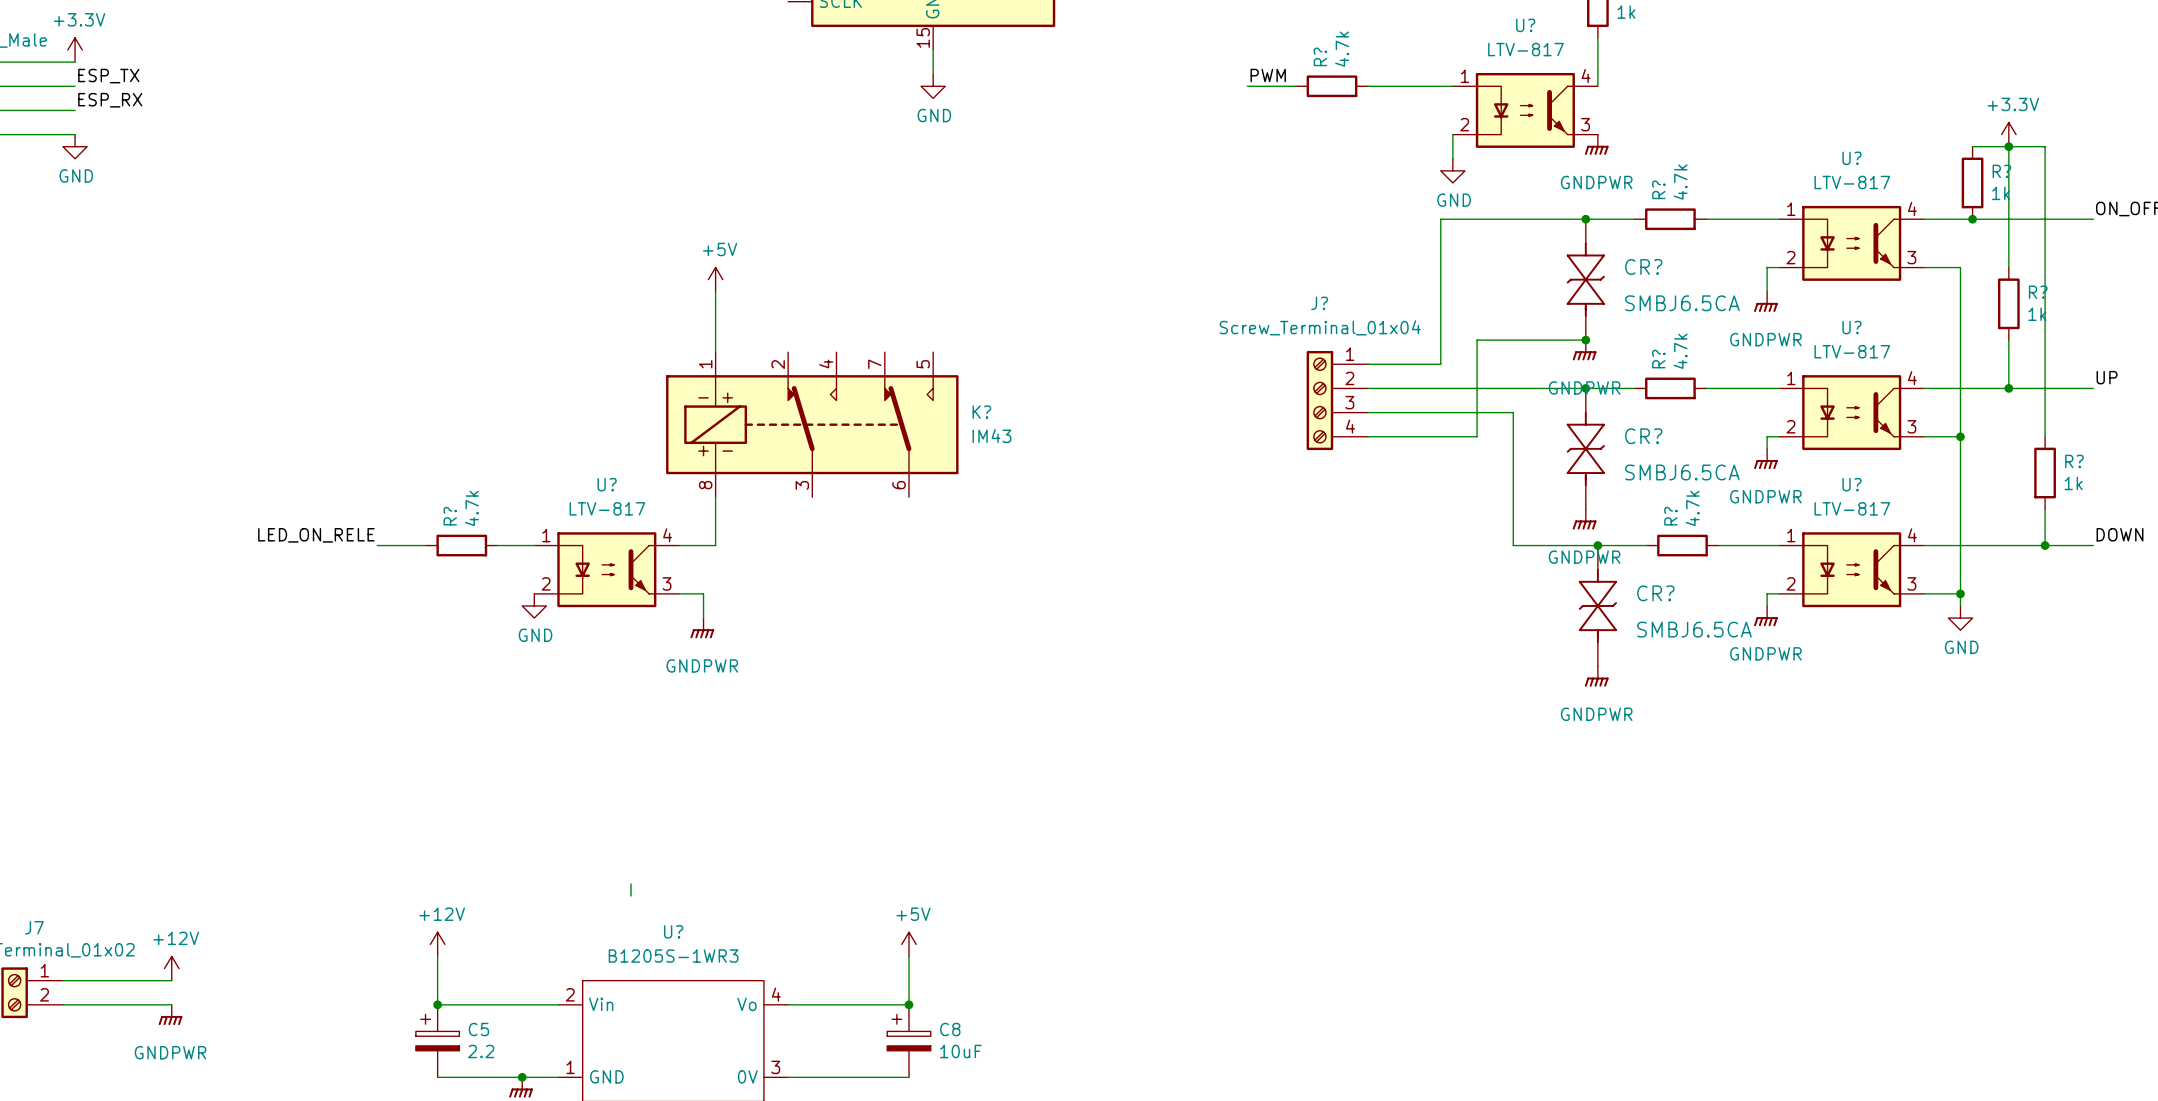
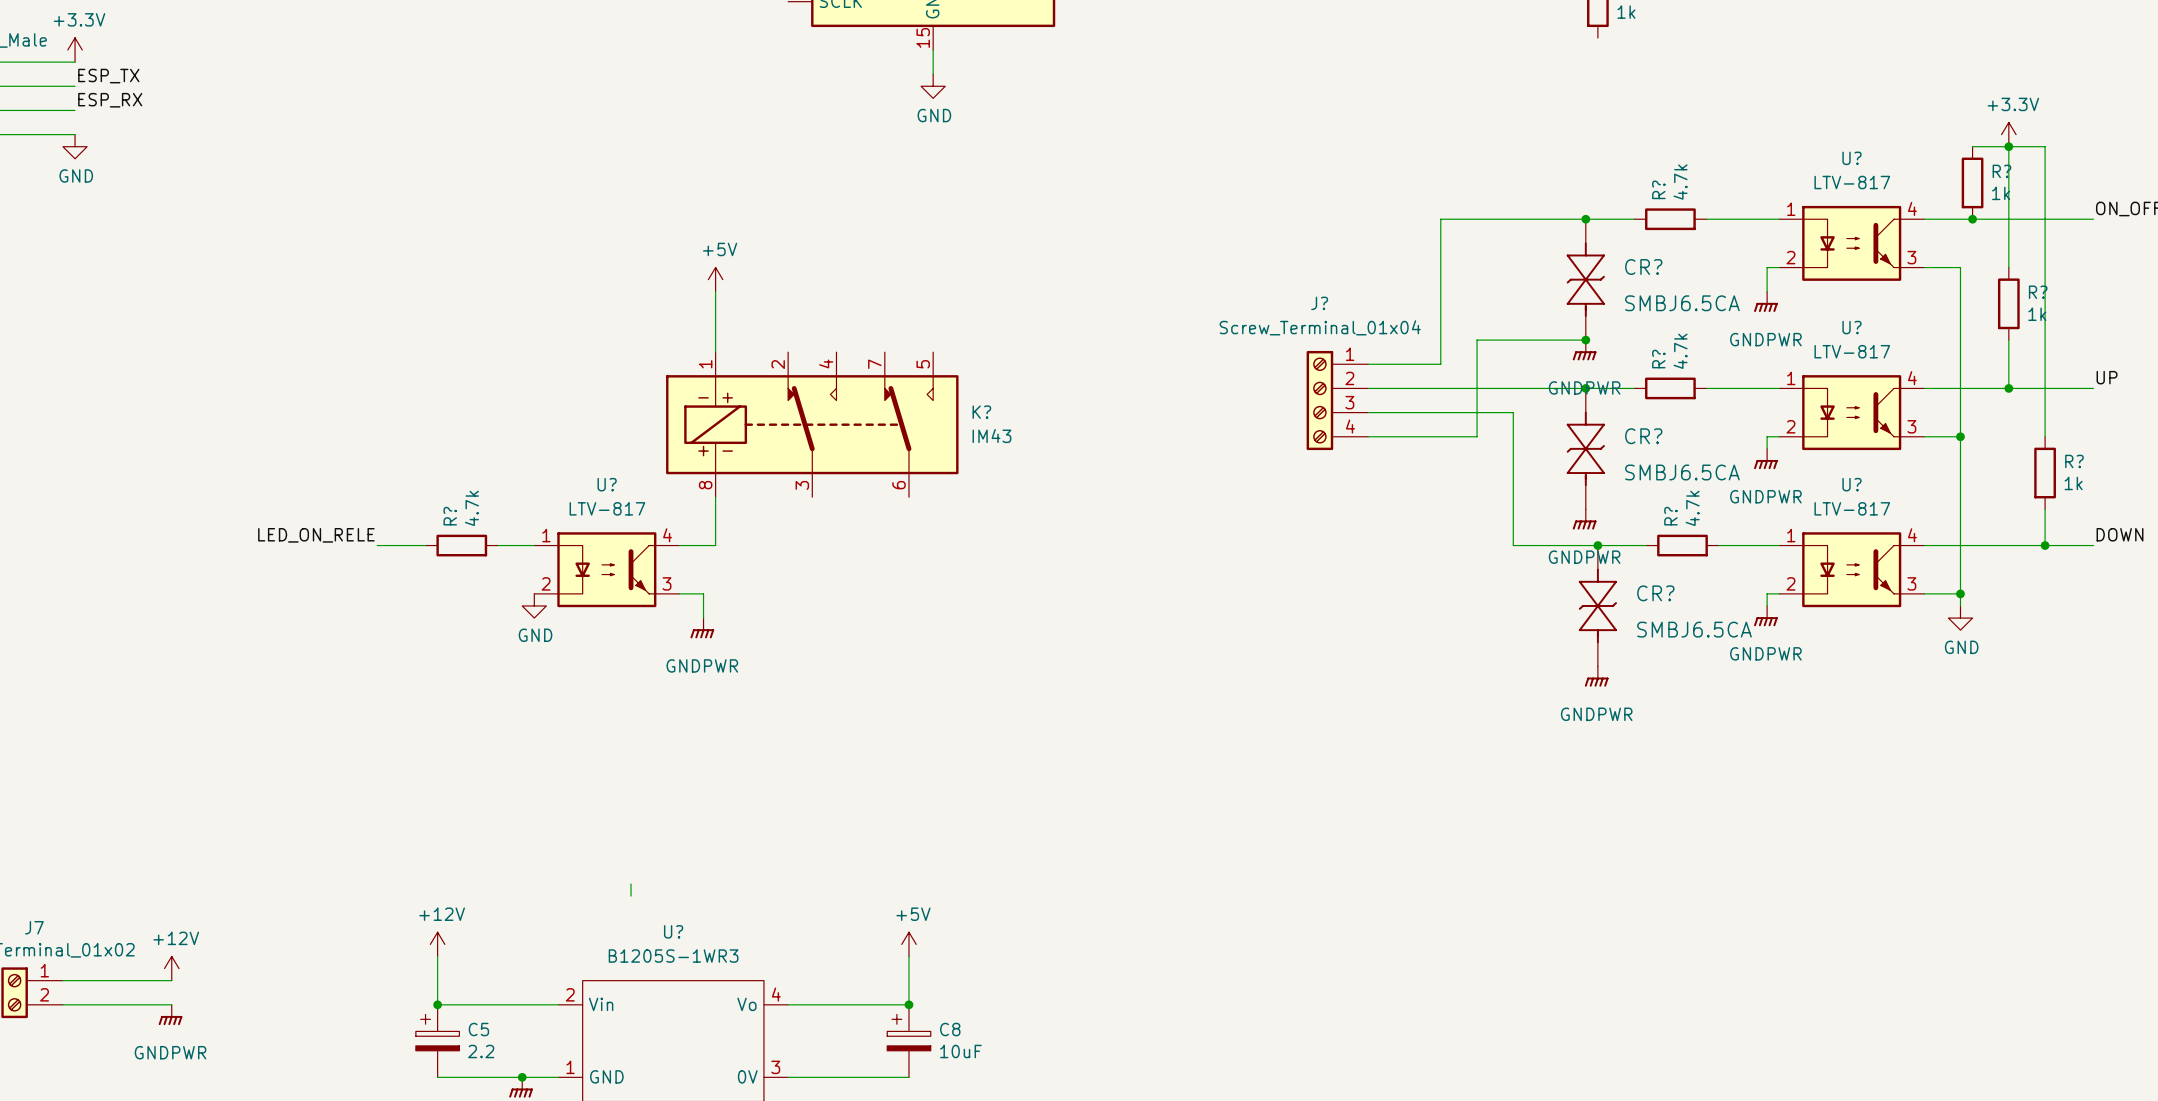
wire: (1597, 37) (1597, 86) -> none
label: PWM (1268, 75) -> none
wire: (1247, 86) (1295, 86) -> none
R?: 4.7k (1332, 86) -> none
wire: (1368, 86) (1452, 86) -> none
U?: LTV-817 (1525, 110) -> none
wire: (1452, 134) (1452, 158) -> none
power symbol: GNDPWR (1596, 144) -> none
power symbol: GND (1452, 170) -> none

